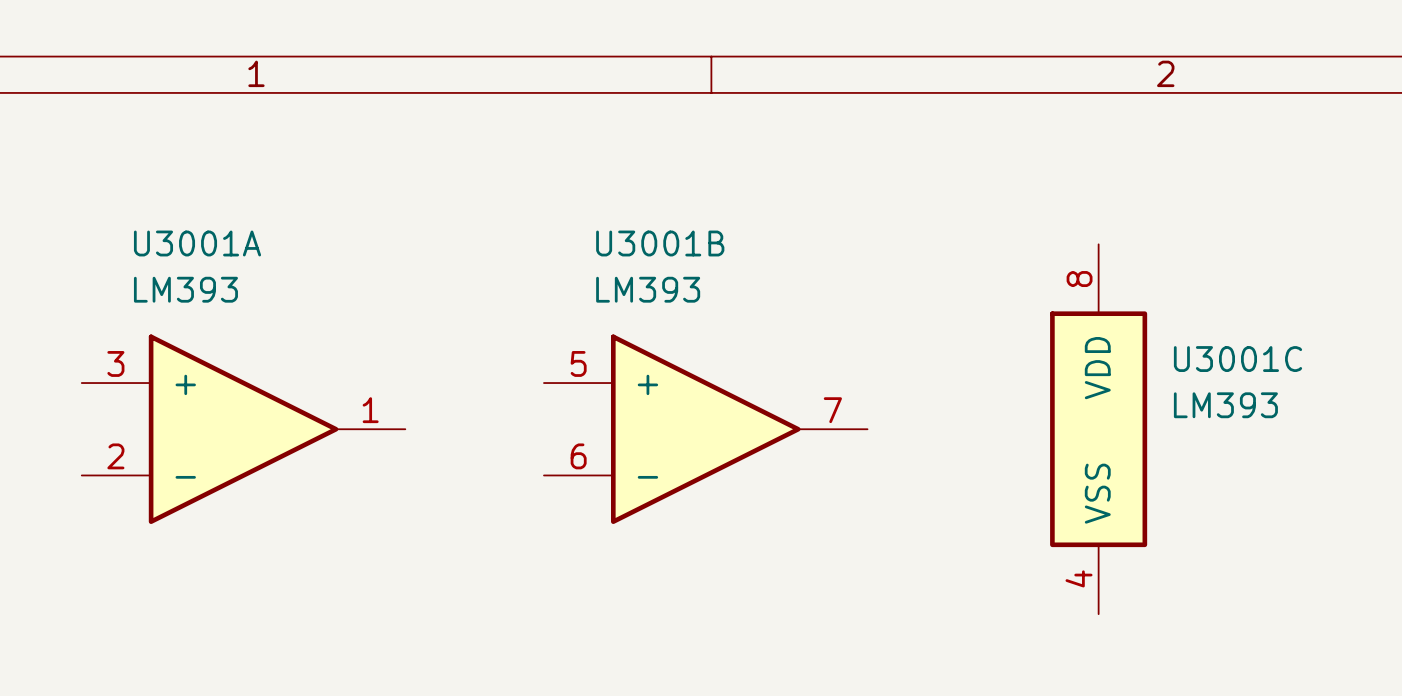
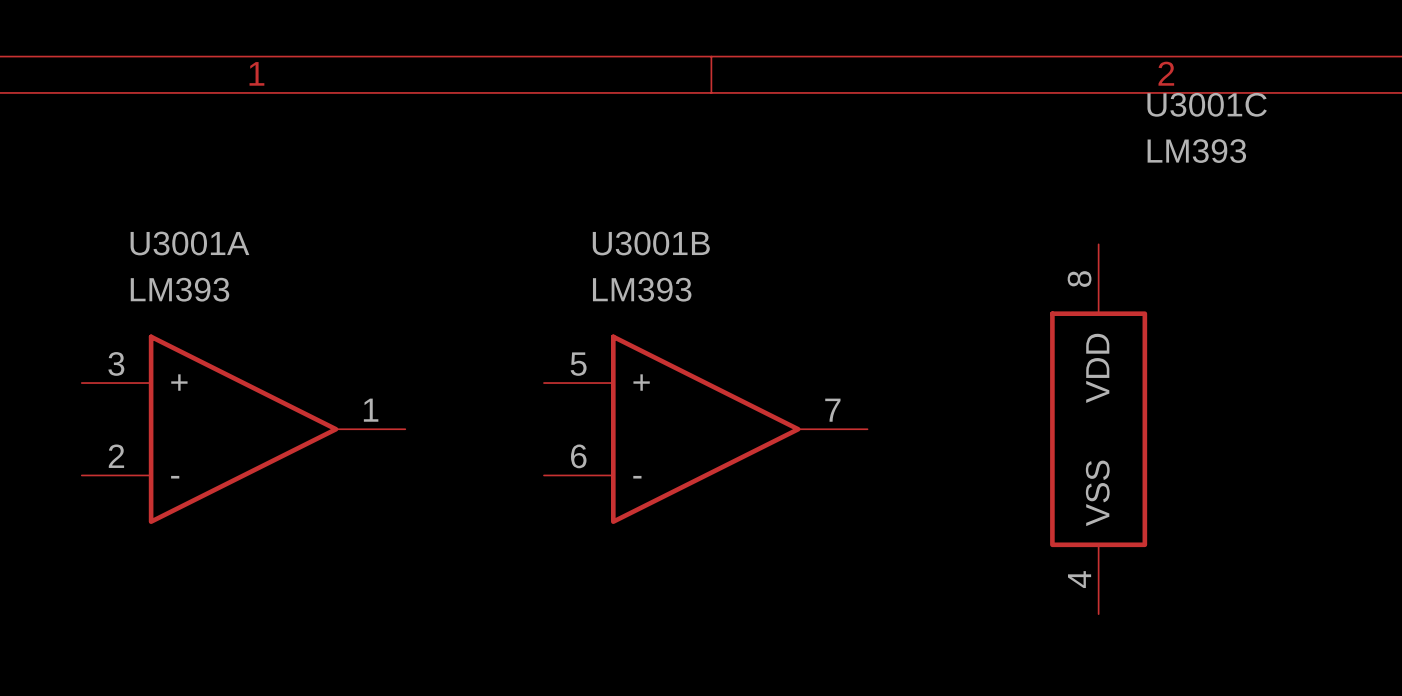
U3001C name position: U3001C (1238, 359) -> U3001C (1207, 104)
U3001C value position: LM393 (1225, 405) -> LM393 (1196, 151)

